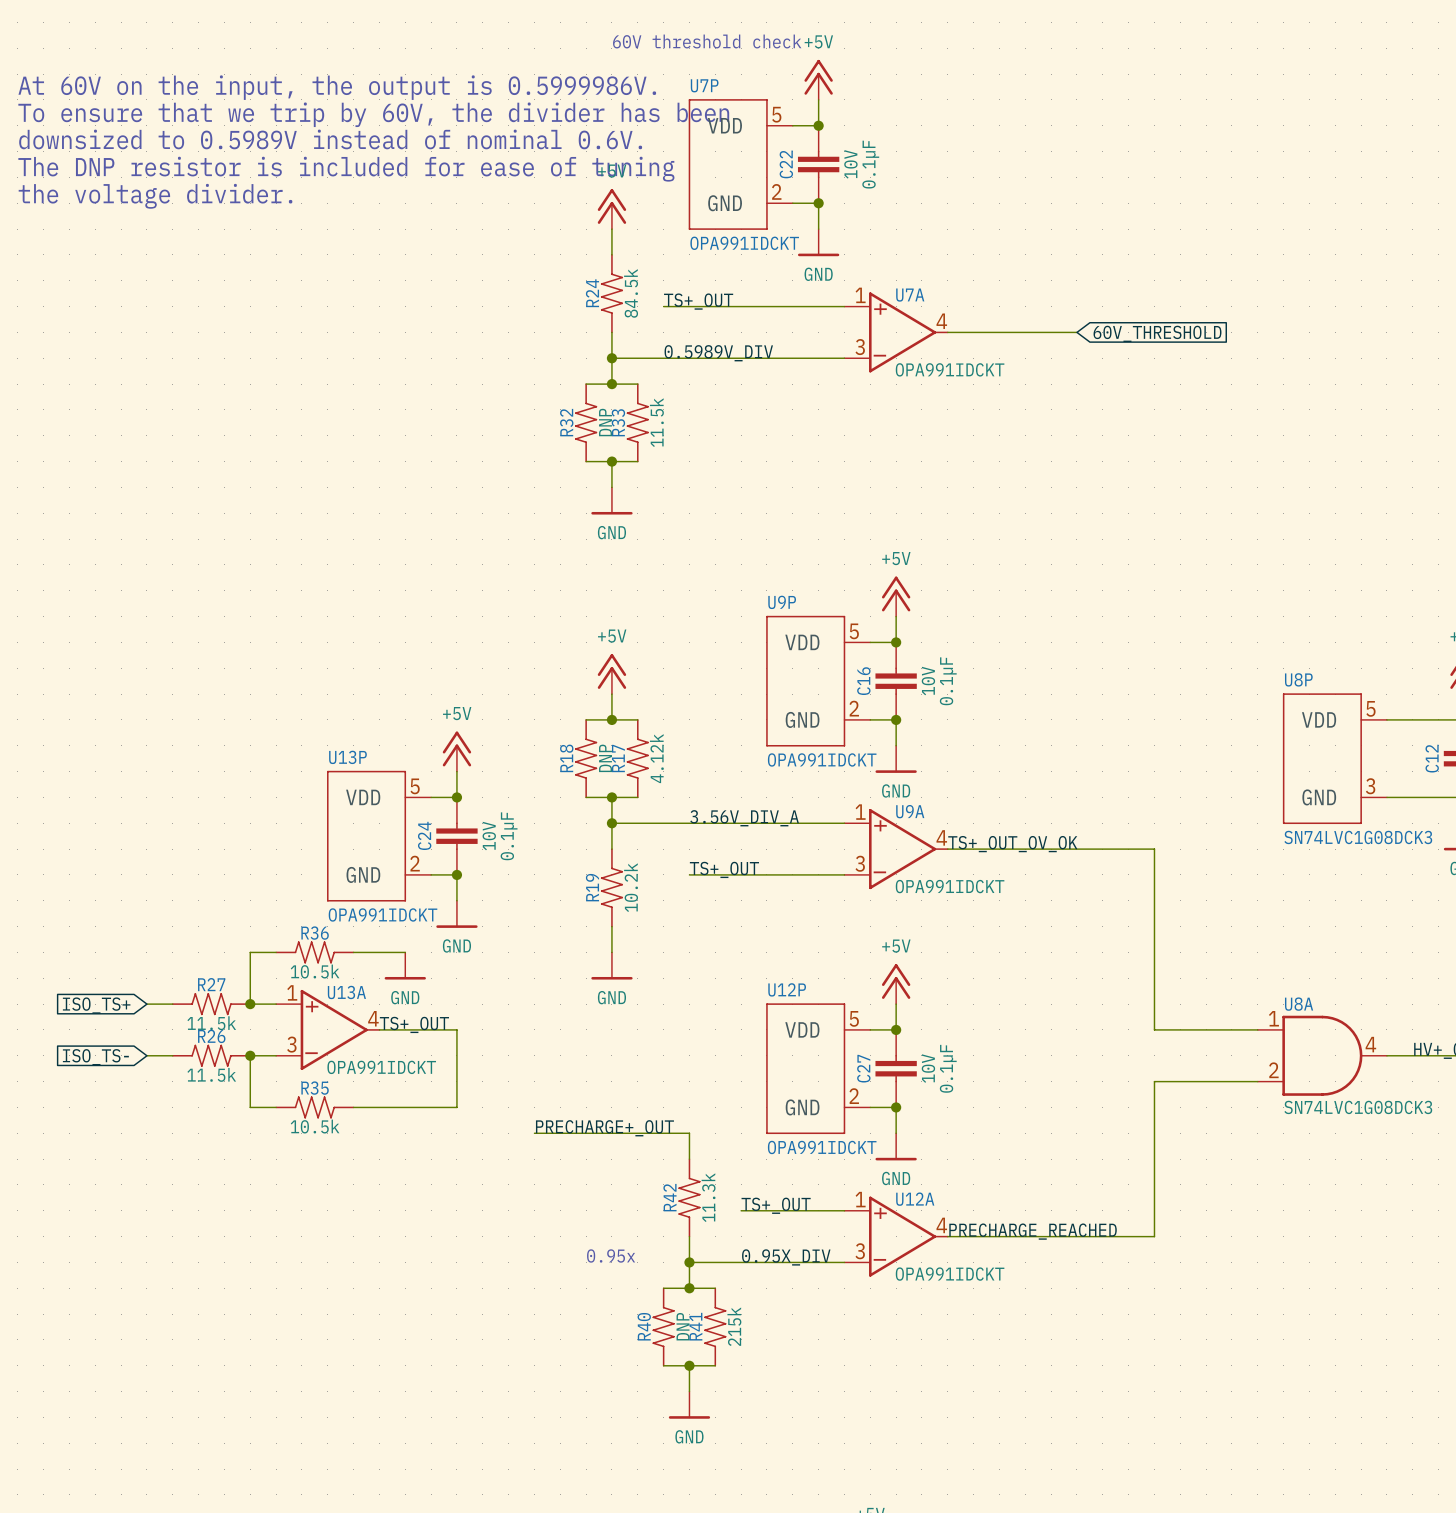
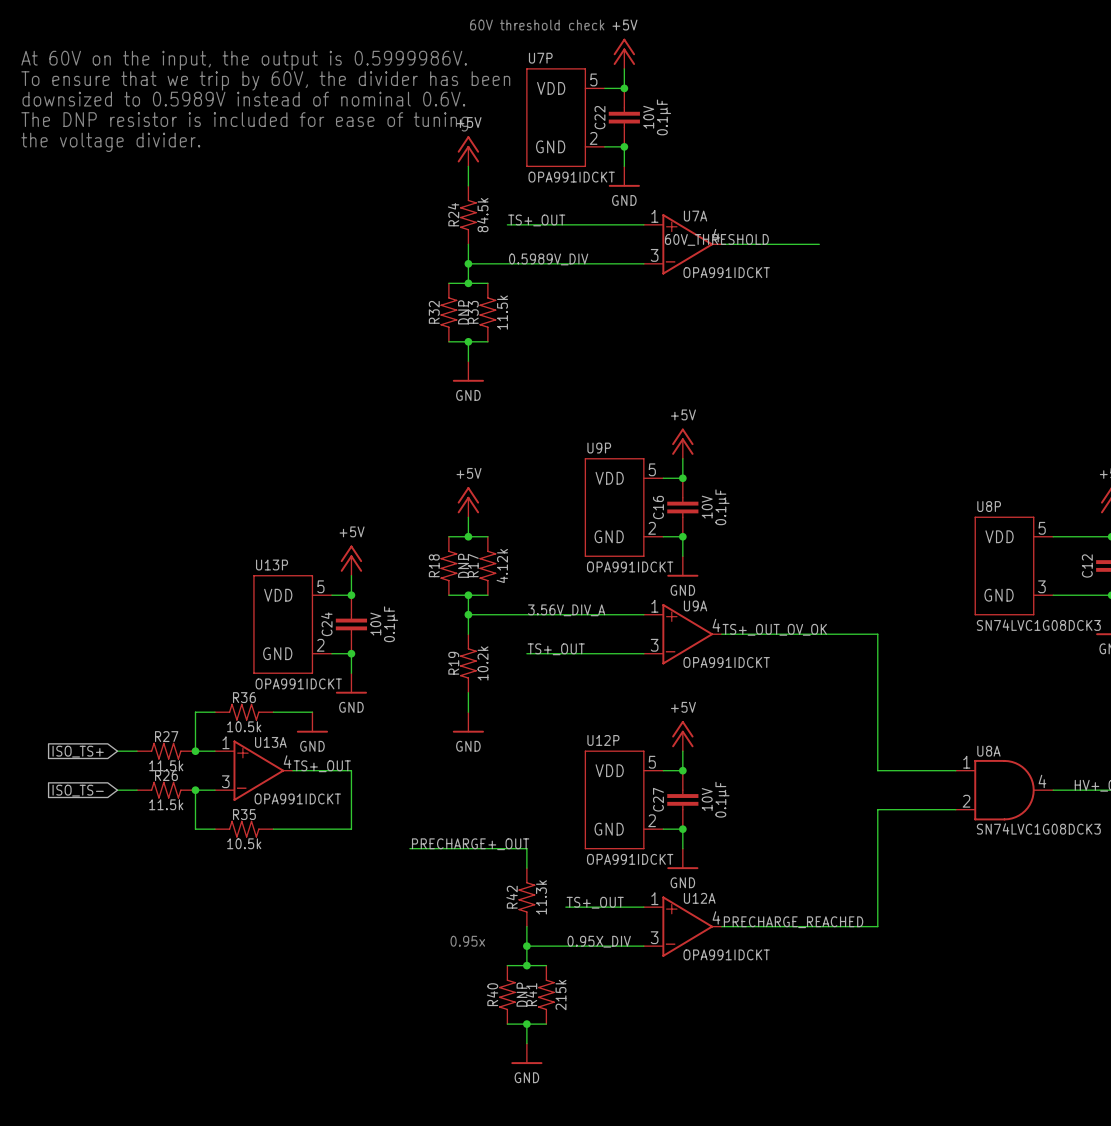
label: none -> 60V_THRESHOLD (716, 239)
global label: 60V_THRESHOLD (1157, 333) -> none

